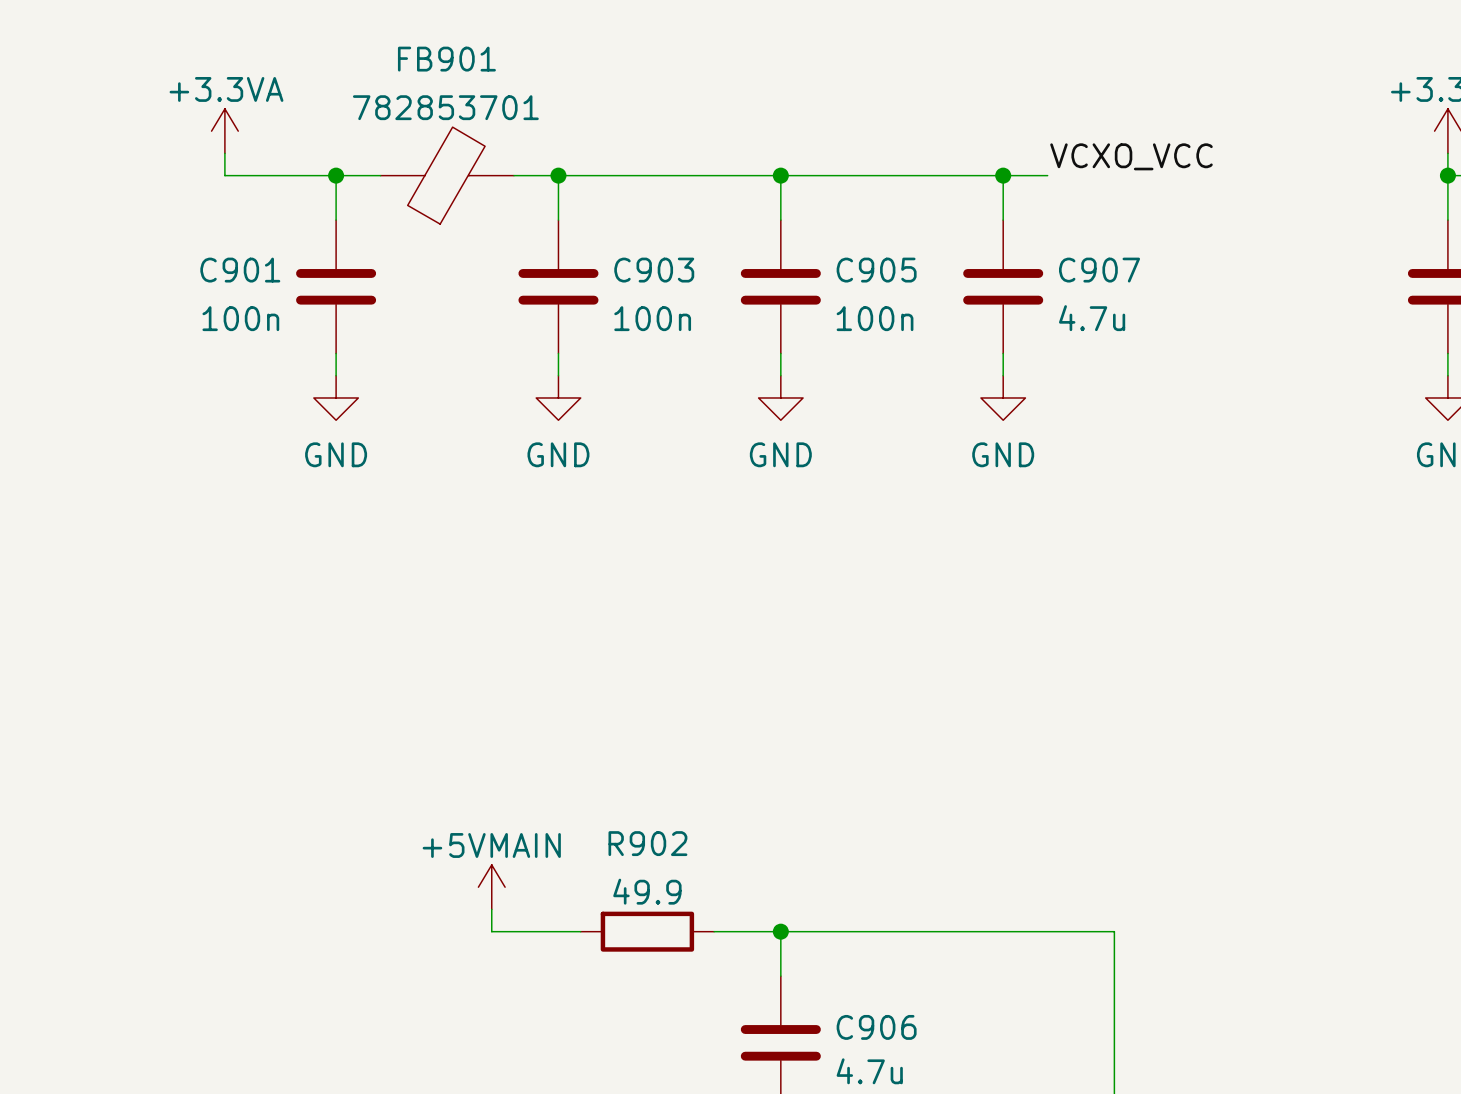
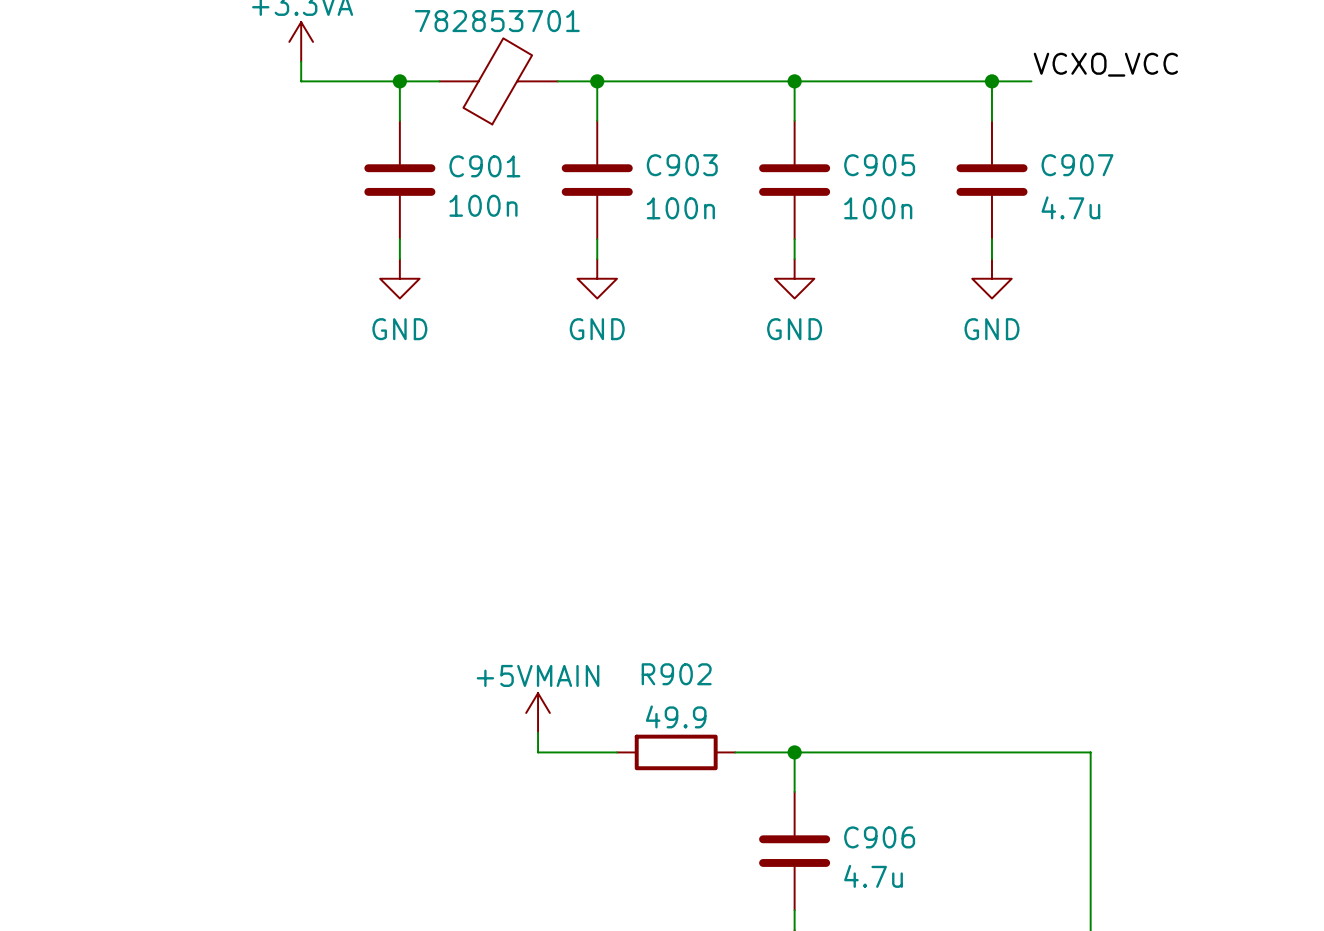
C901 name position: C901 (240, 270) -> C901 (484, 166)
C901 value position: 100n (240, 318) -> 100n (483, 205)

